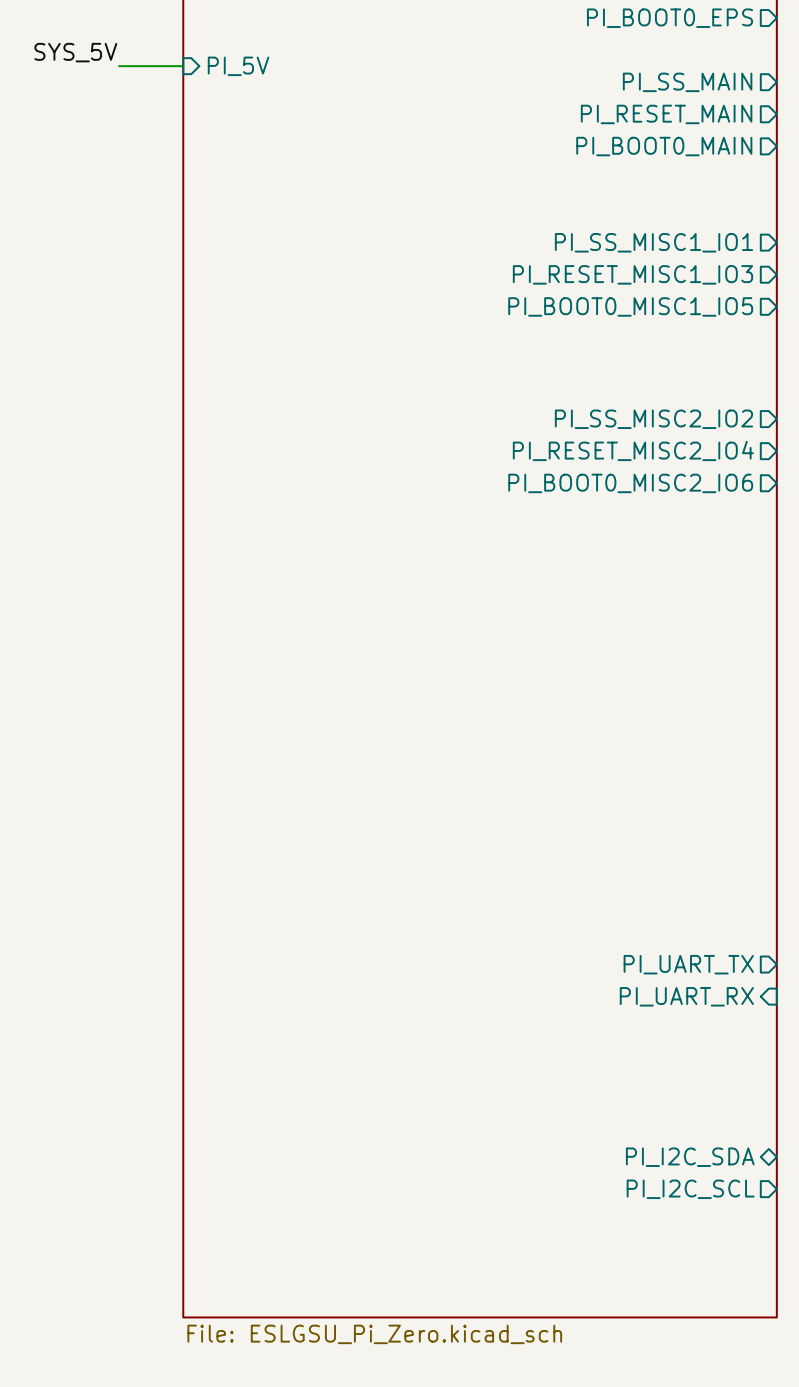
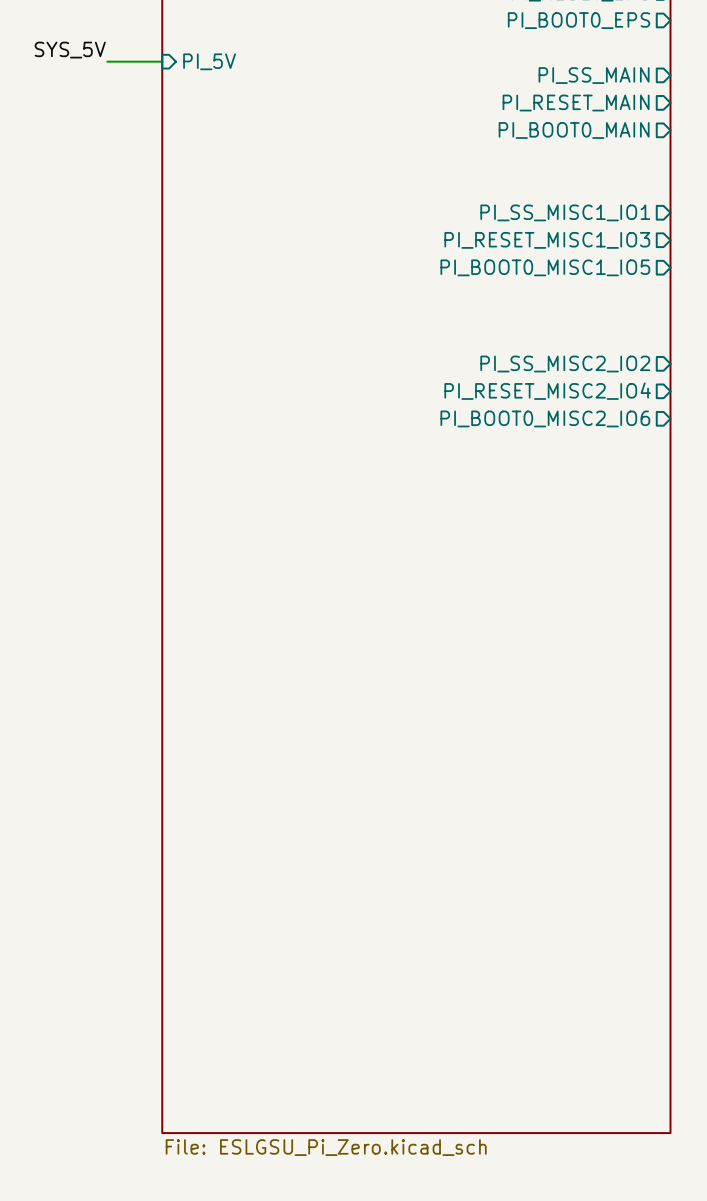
sheet pin: PI_UART_TX (688, 964) -> none
sheet pin: PI_UART_RX (686, 996) -> none
sheet pin: PI_I2C_SDA (690, 1157) -> none
sheet pin: PI_I2C_SCL (690, 1189) -> none

